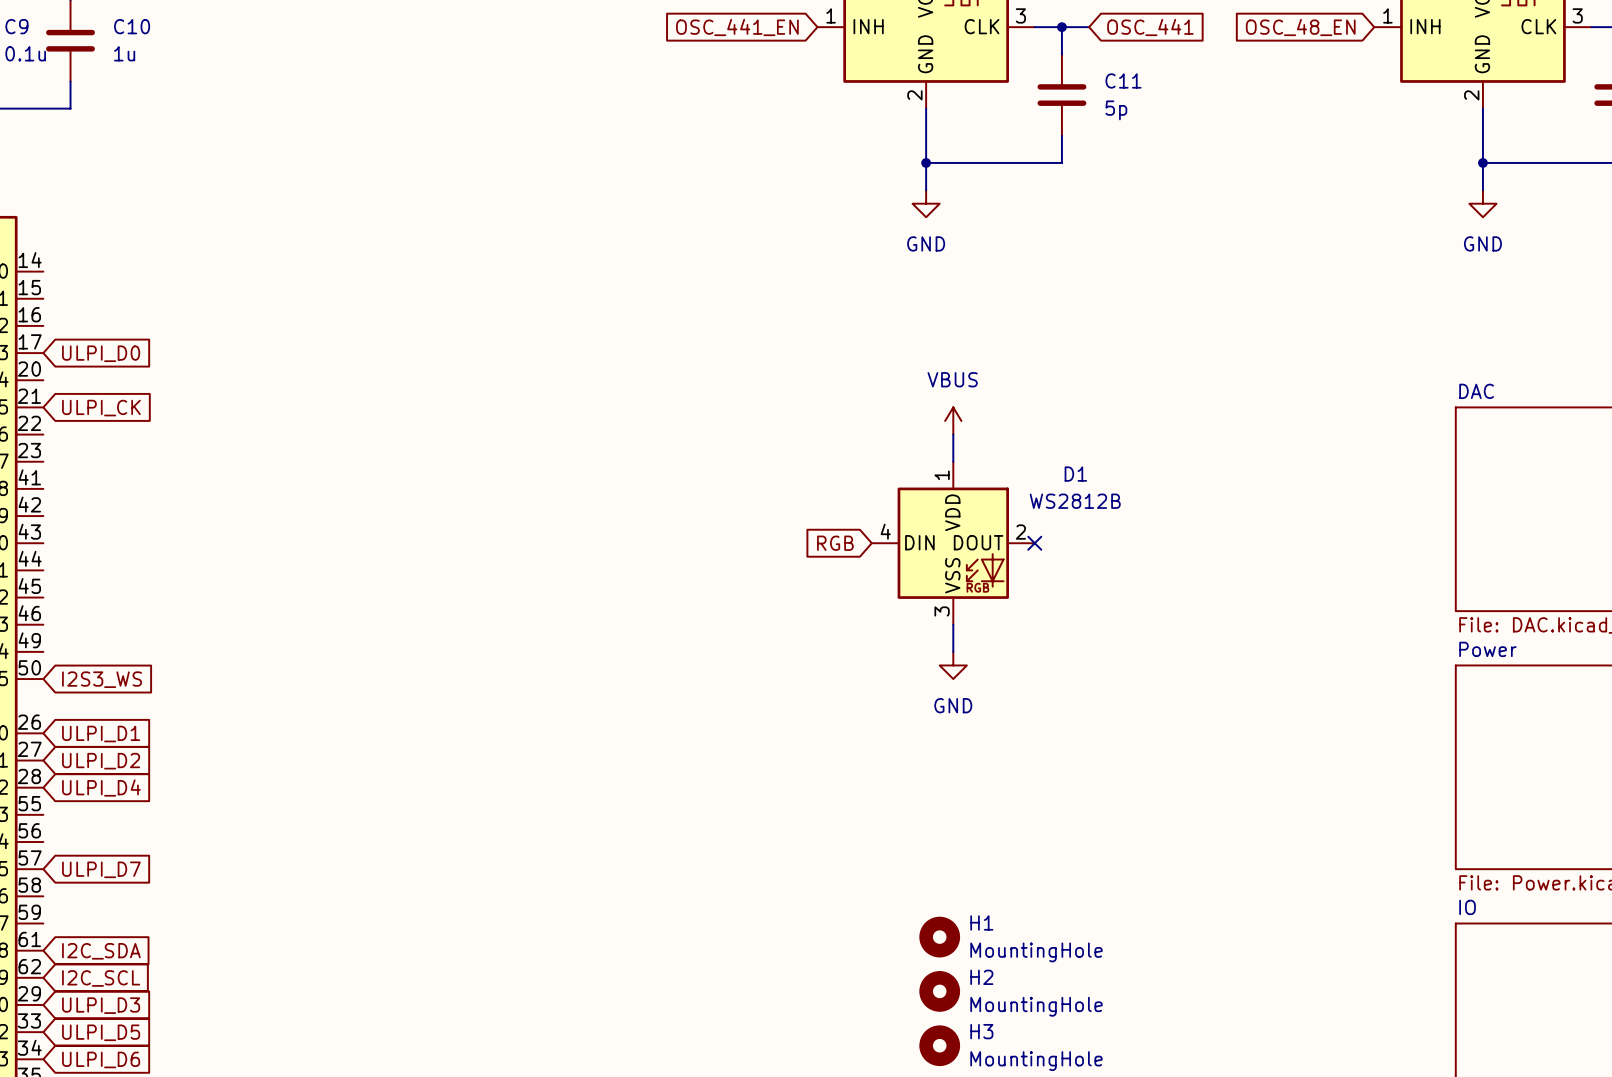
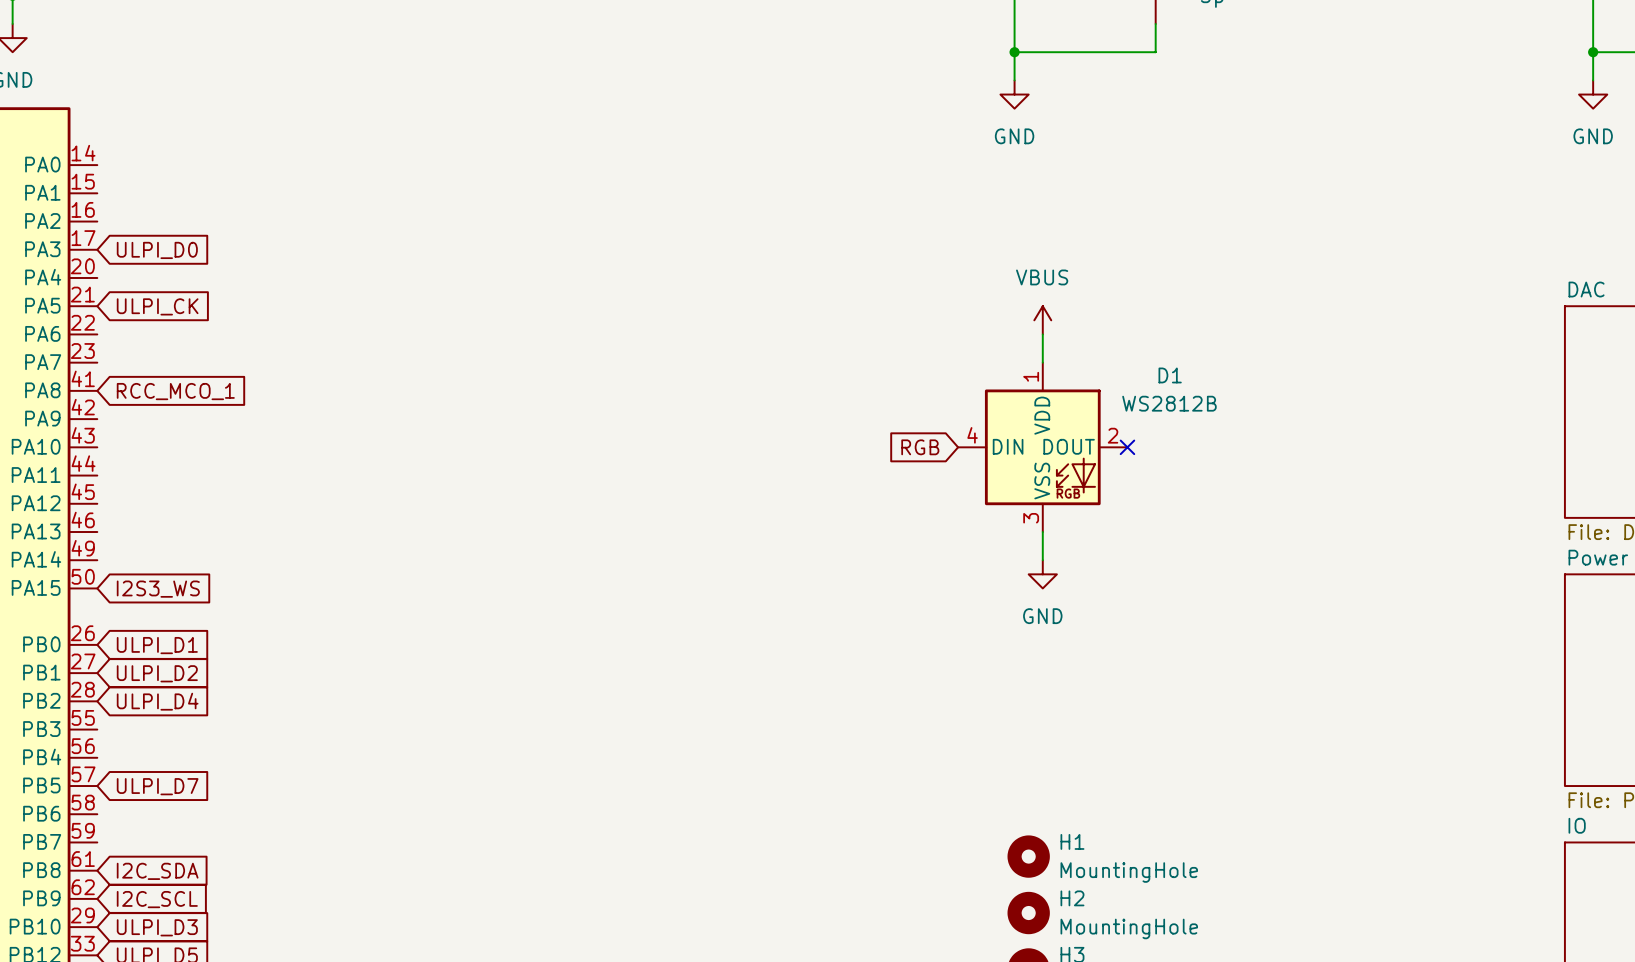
global label: none -> RCC_MCO_1 (175, 391)

